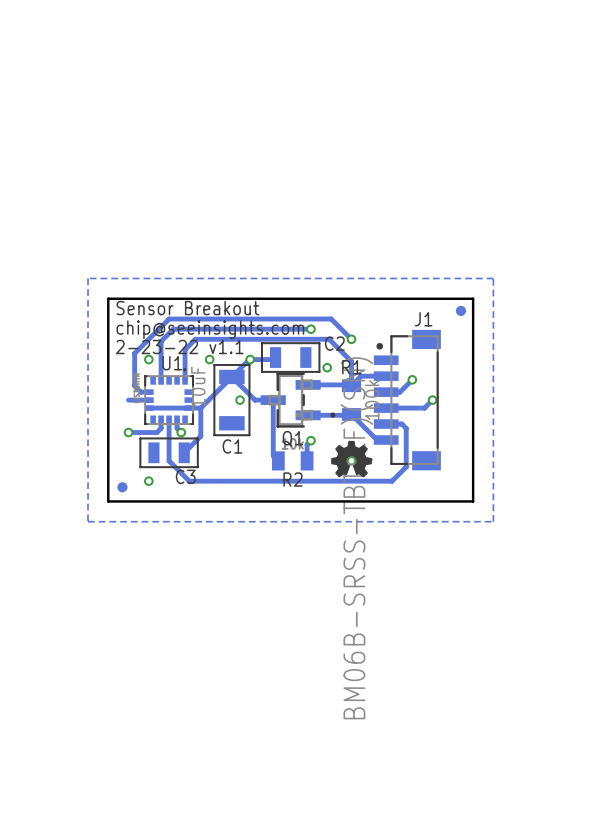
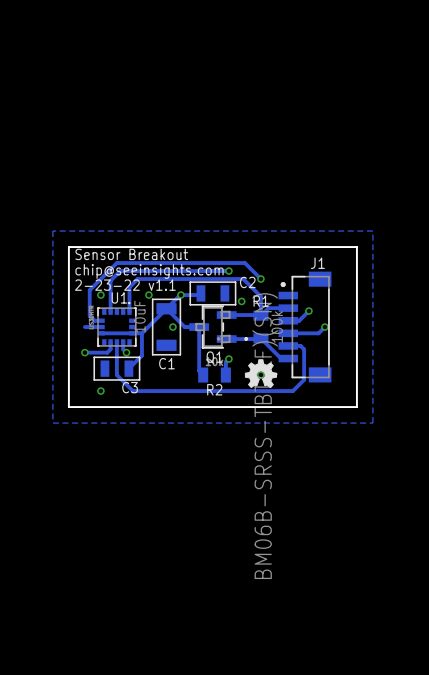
part: (460, 310) -> none
part: (122, 487) -> none

